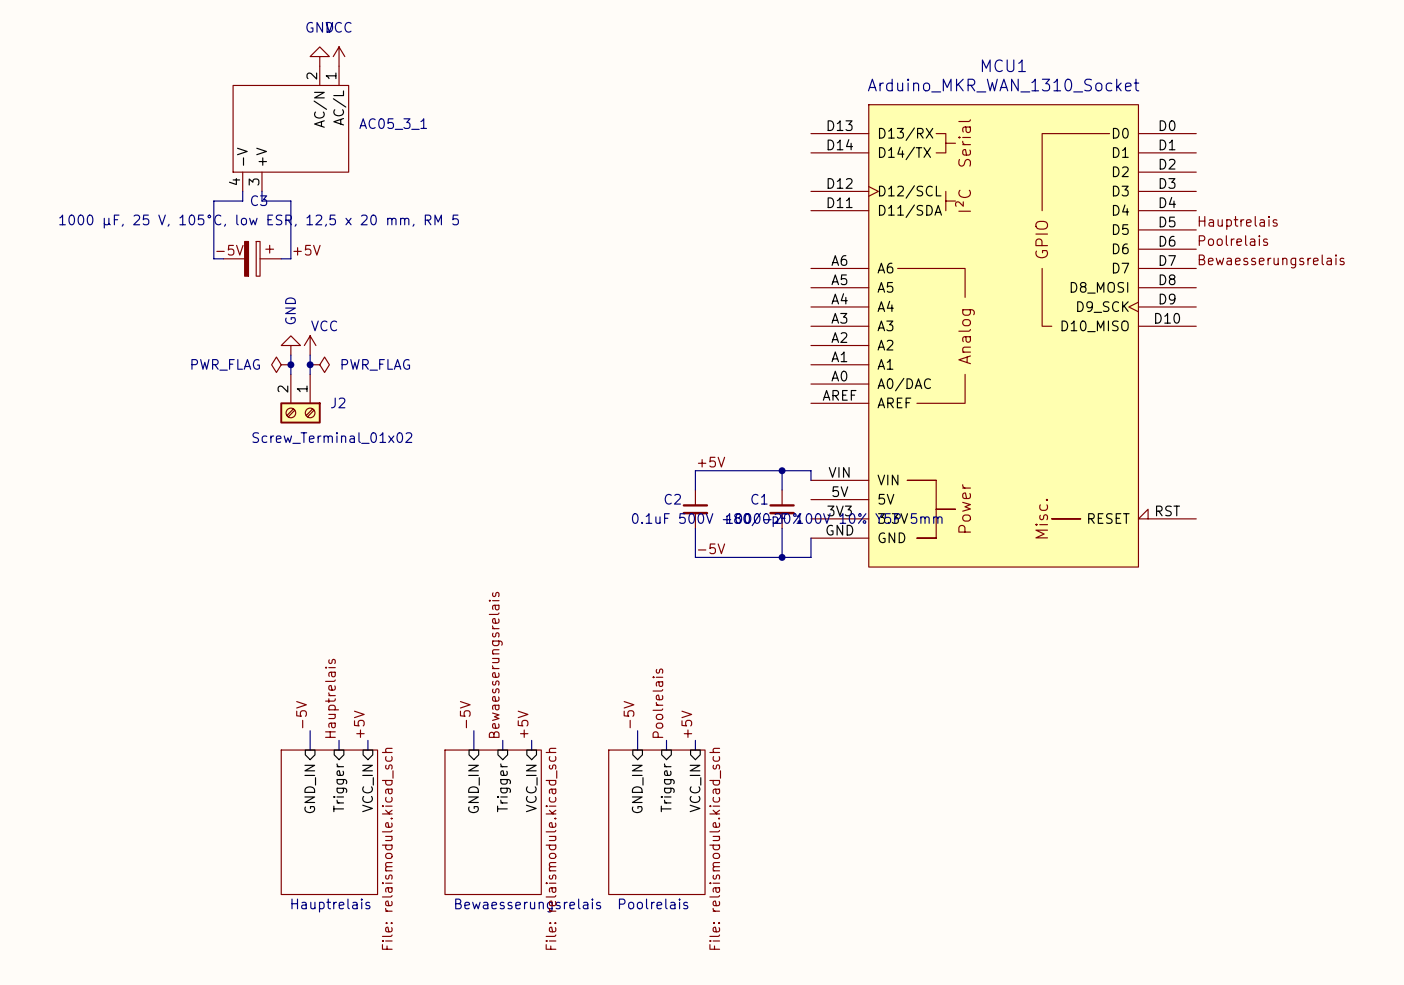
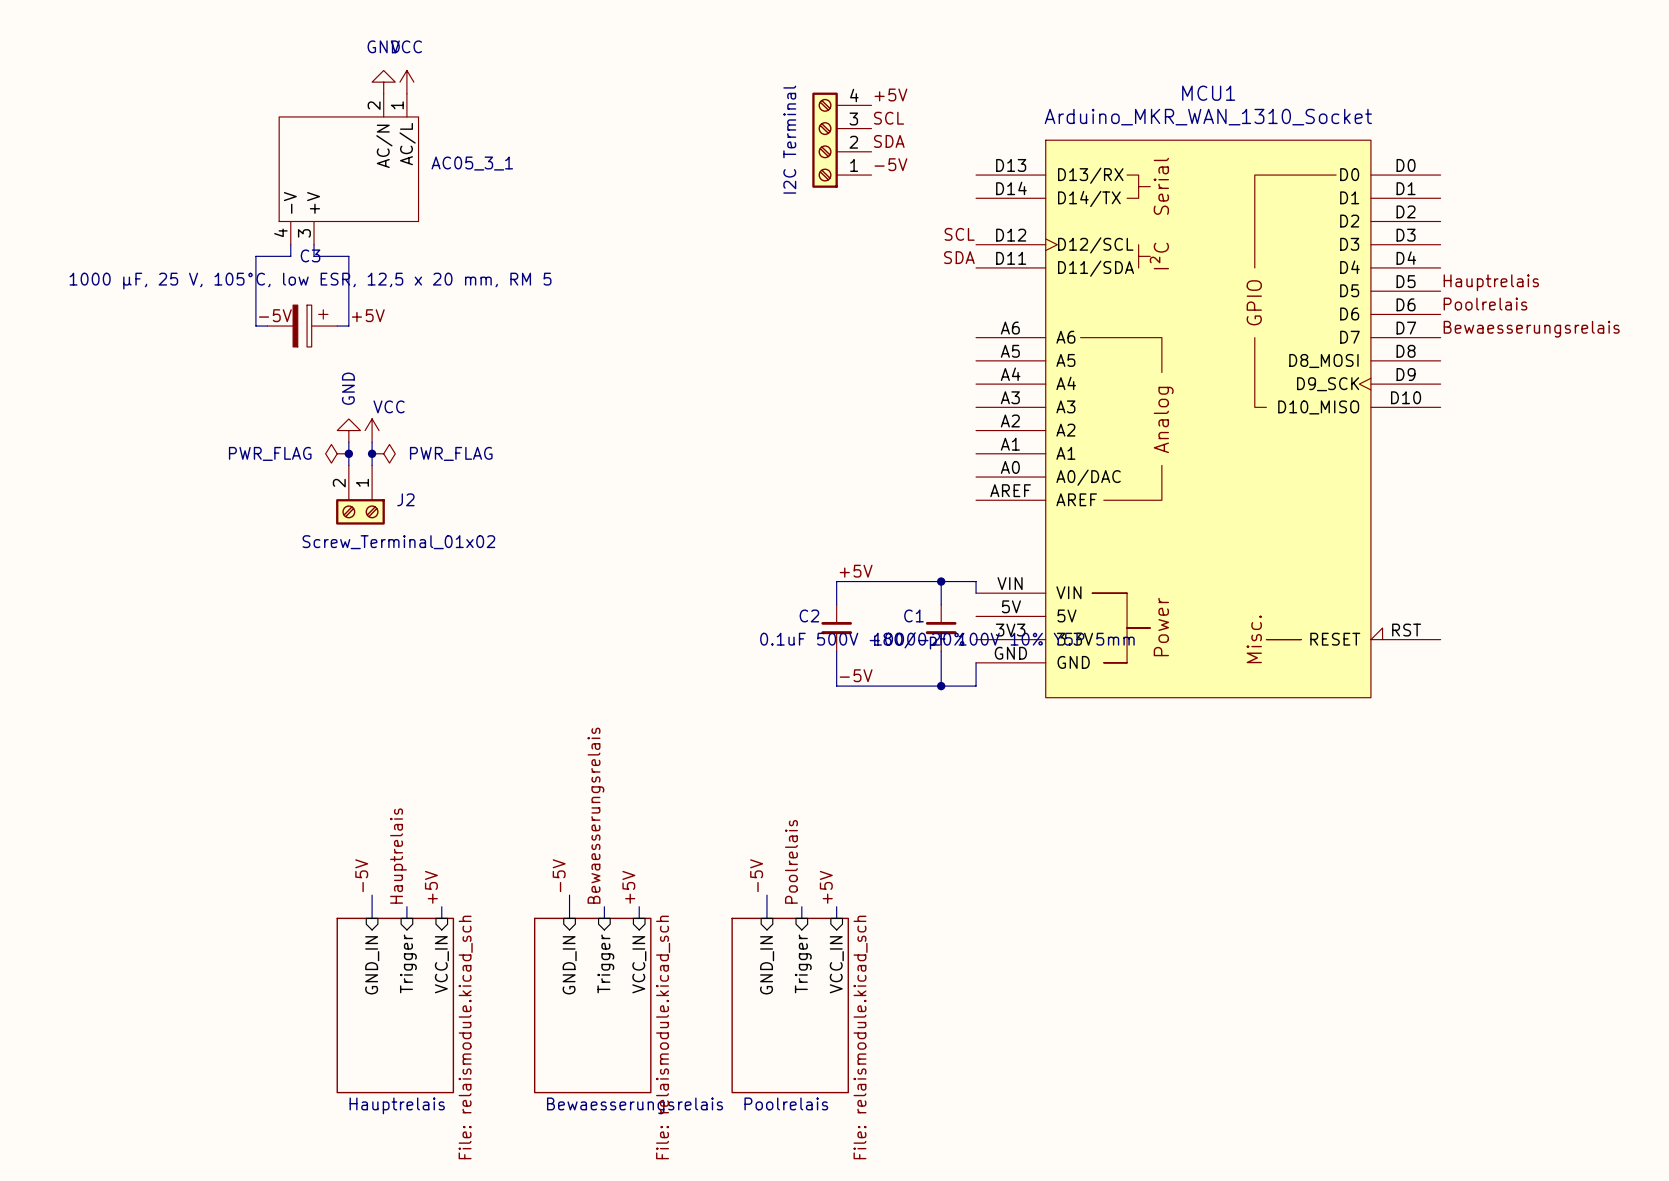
label: none -> +5V (890, 94)
label: none -> SCL (889, 118)
part: none -> I2C Terminal (841, 140)
label: none -> SDA (889, 141)
label: none -> -5V (890, 164)
label: none -> SCL (959, 234)
label: none -> SDA (959, 257)

